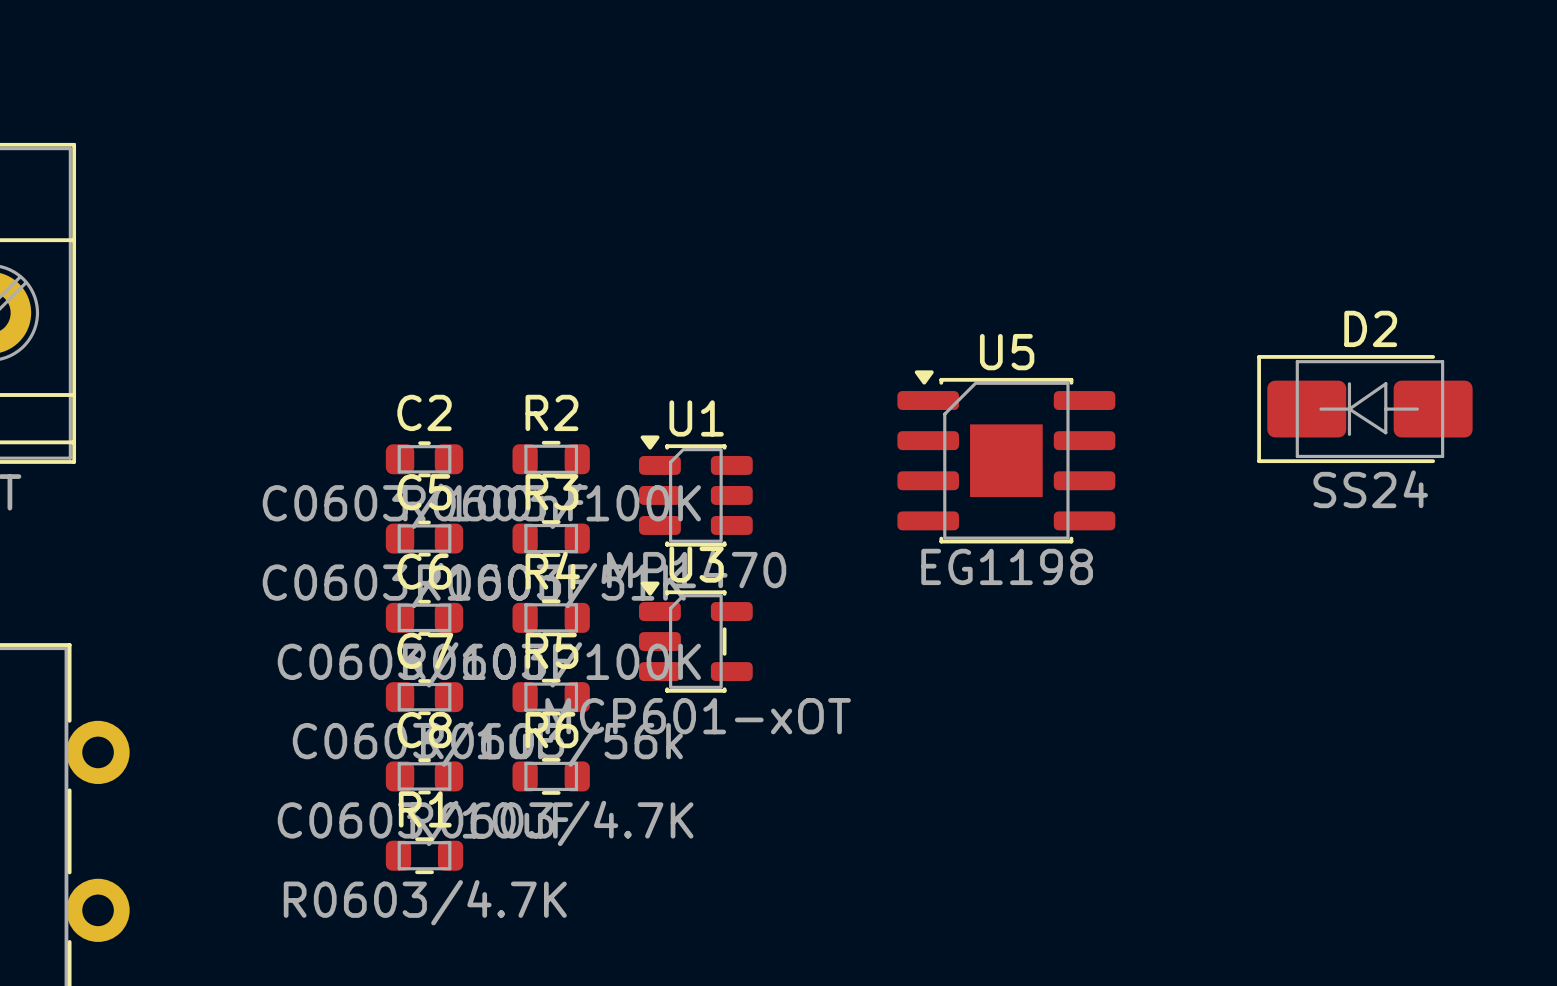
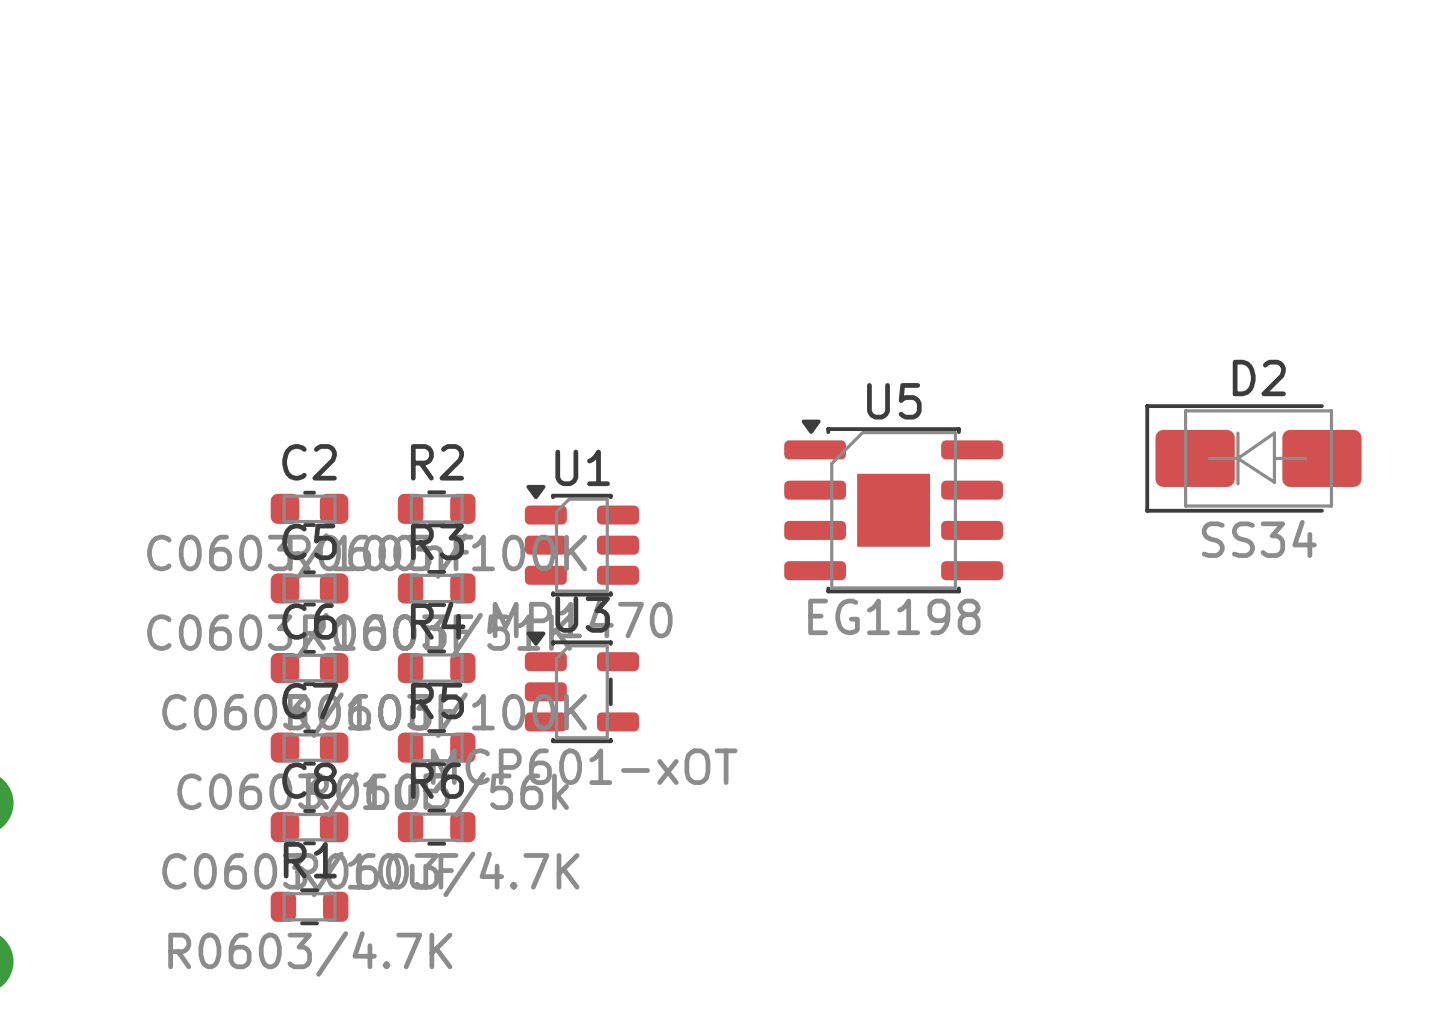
D2 value: SS24 (1370, 489) -> SS34 (1259, 538)

